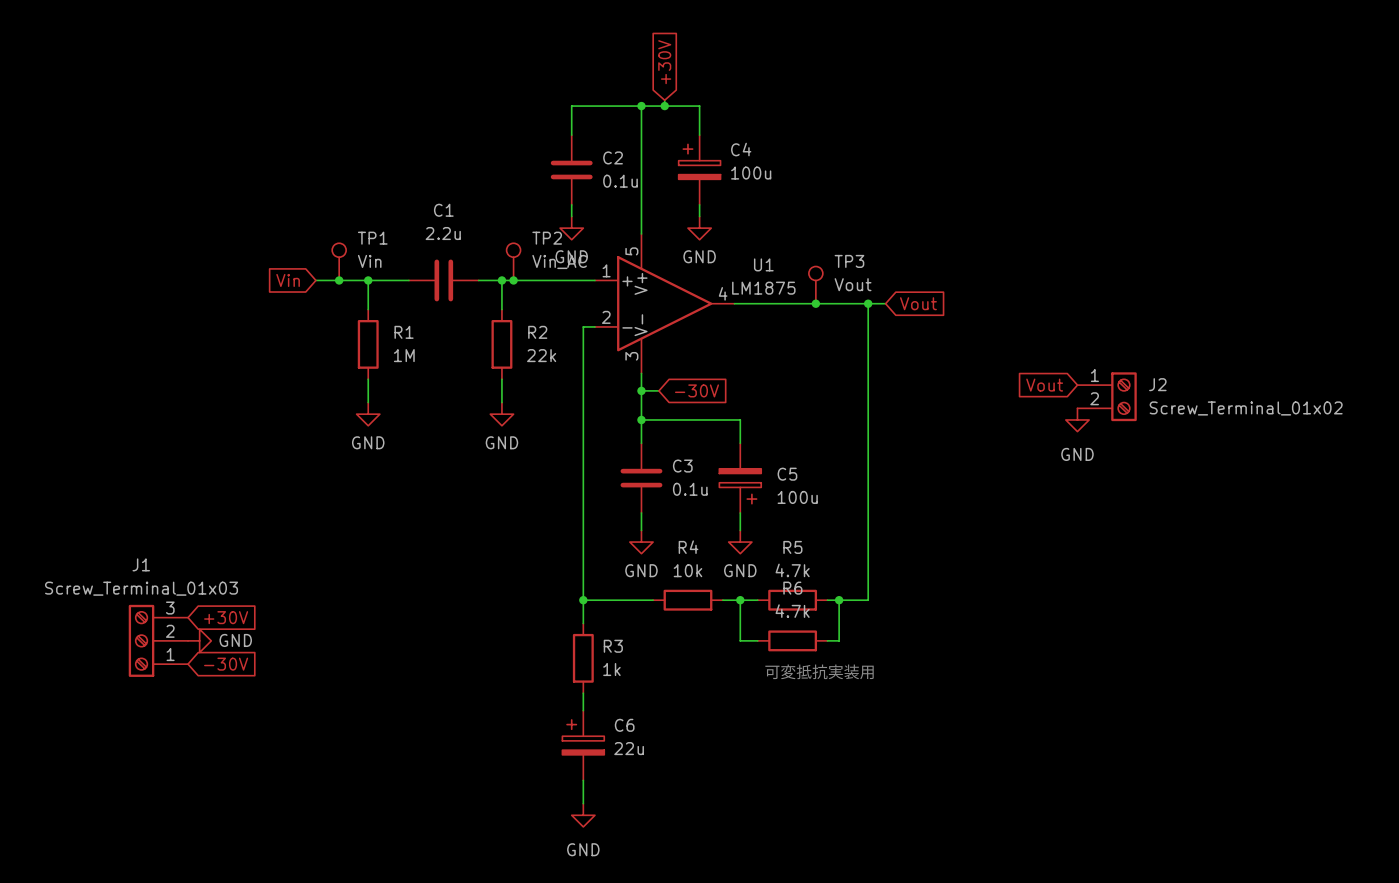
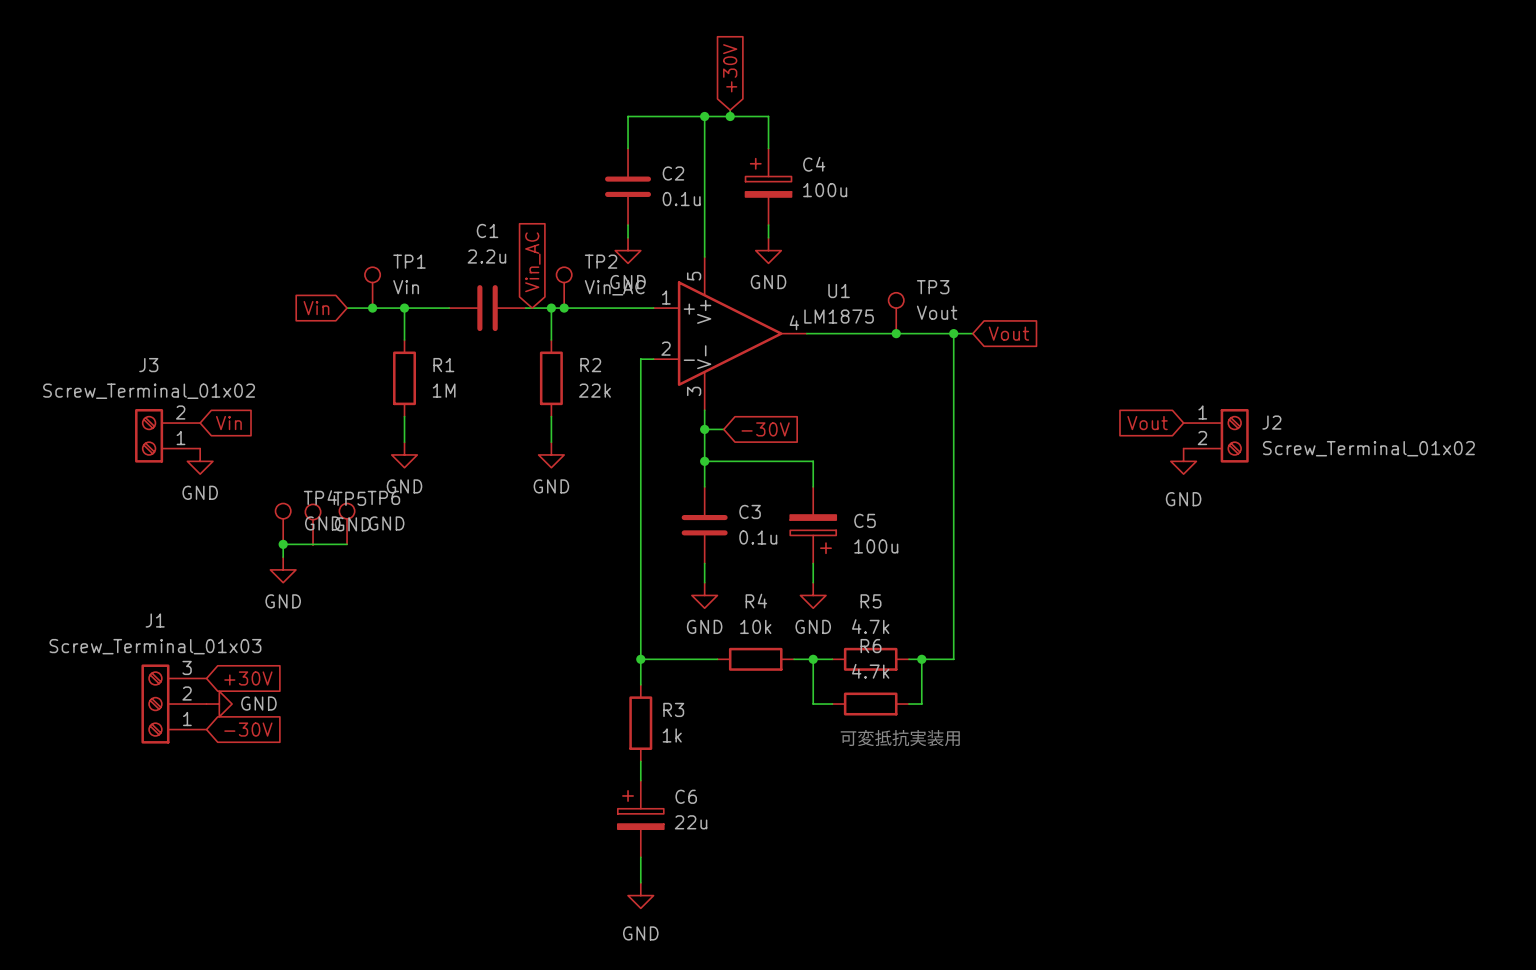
global label: none -> Vin_AC (532, 262)
global label: none -> Vin (228, 423)
J3: none -> Screw_Terminal_01x02 (167, 435)
power symbol: none -> GND (200, 461)
TP4: none -> GND (283, 523)
TP6: none -> GND (347, 523)
TP5: none -> GND (313, 524)
junction: none -> (283, 544)
wire: none -> (347, 544) (283, 544) (283, 557)
power symbol: none -> GND (283, 569)

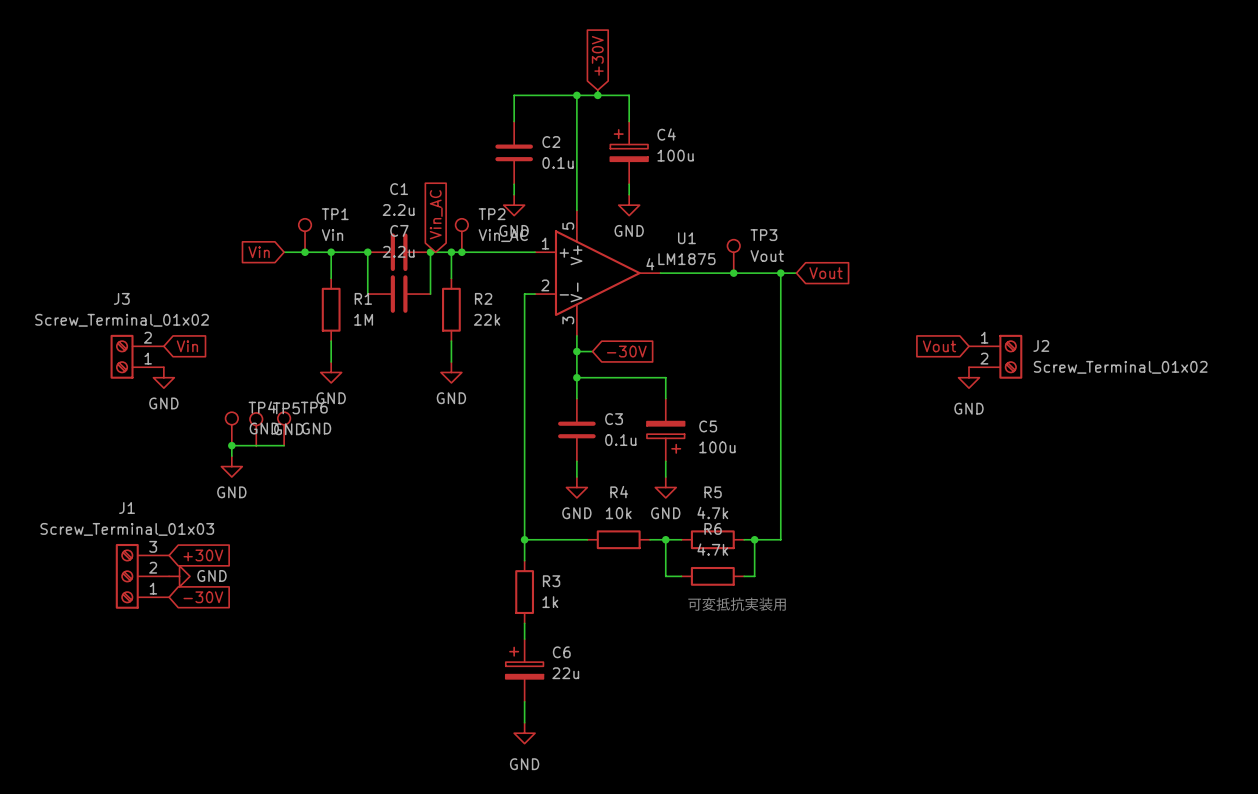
wire: none -> (367, 252) (367, 294)
junction: none -> (367, 252)
wire: none -> (430, 252) (430, 294)
junction: none -> (430, 252)
C7: none -> 2.2u (399, 294)

